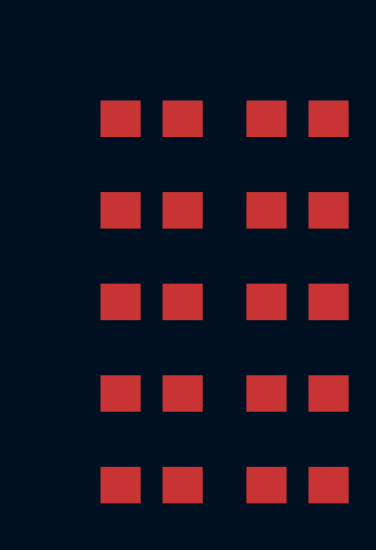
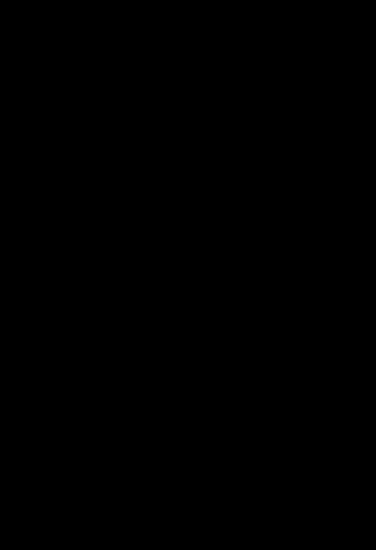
part: (151, 118) -> none
part: (297, 118) -> none
part: (151, 210) -> none
part: (297, 210) -> none
part: (151, 301) -> none
part: (297, 301) -> none
part: (151, 393) -> none
part: (297, 393) -> none
part: (151, 485) -> none
part: (297, 485) -> none

